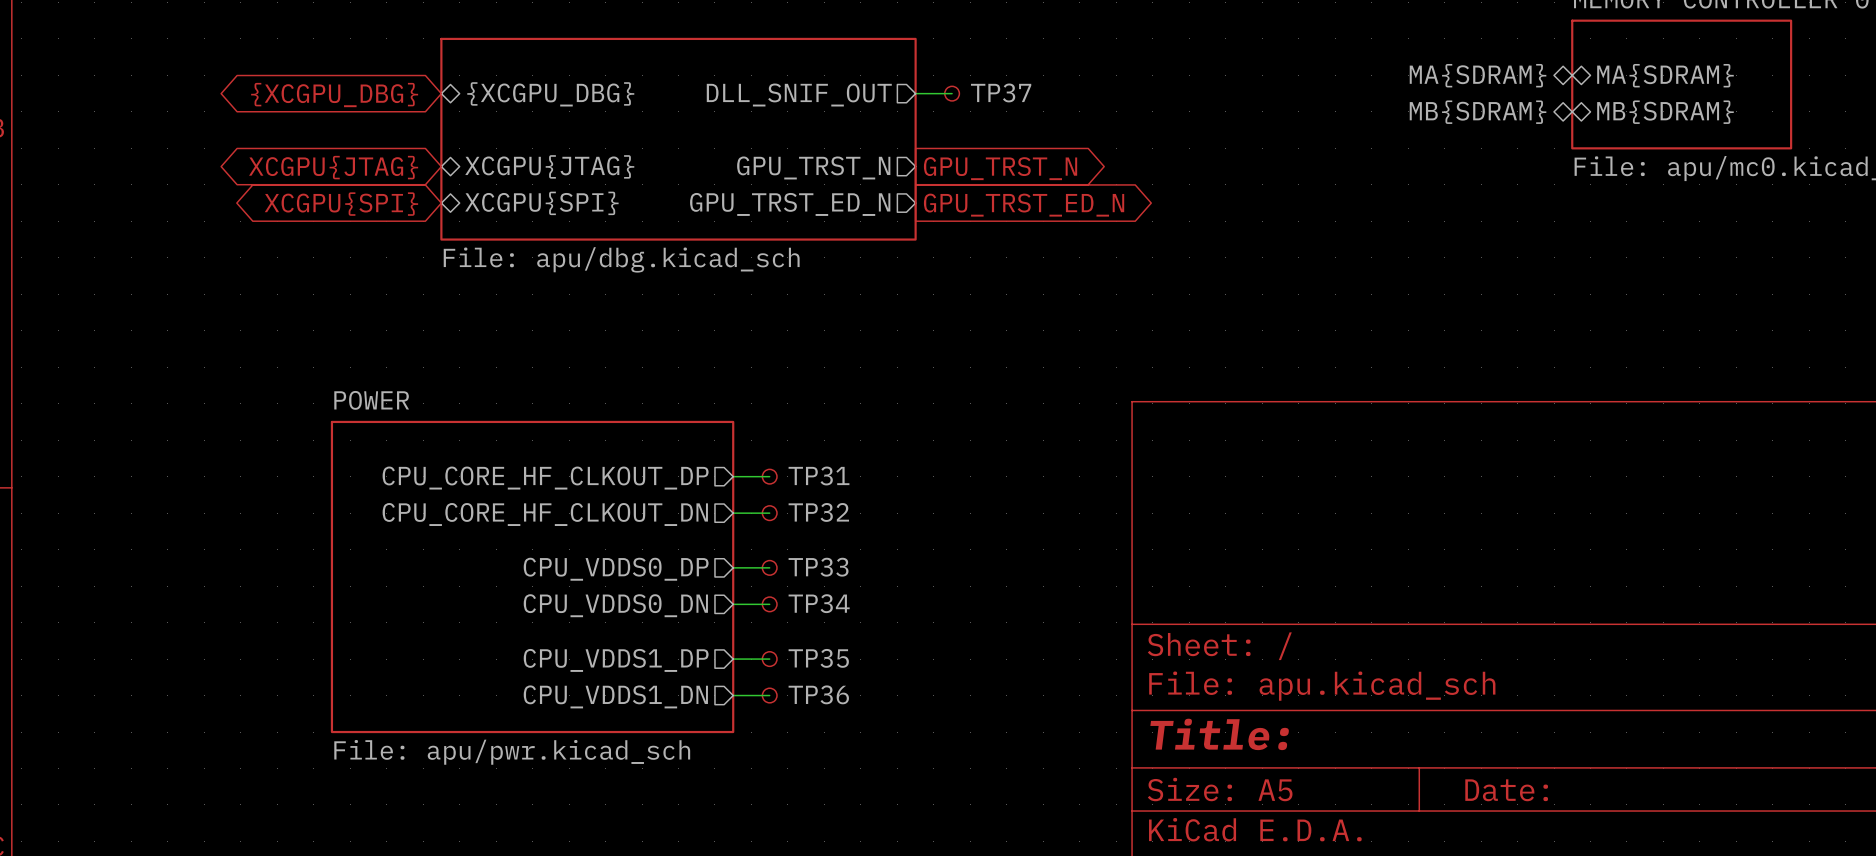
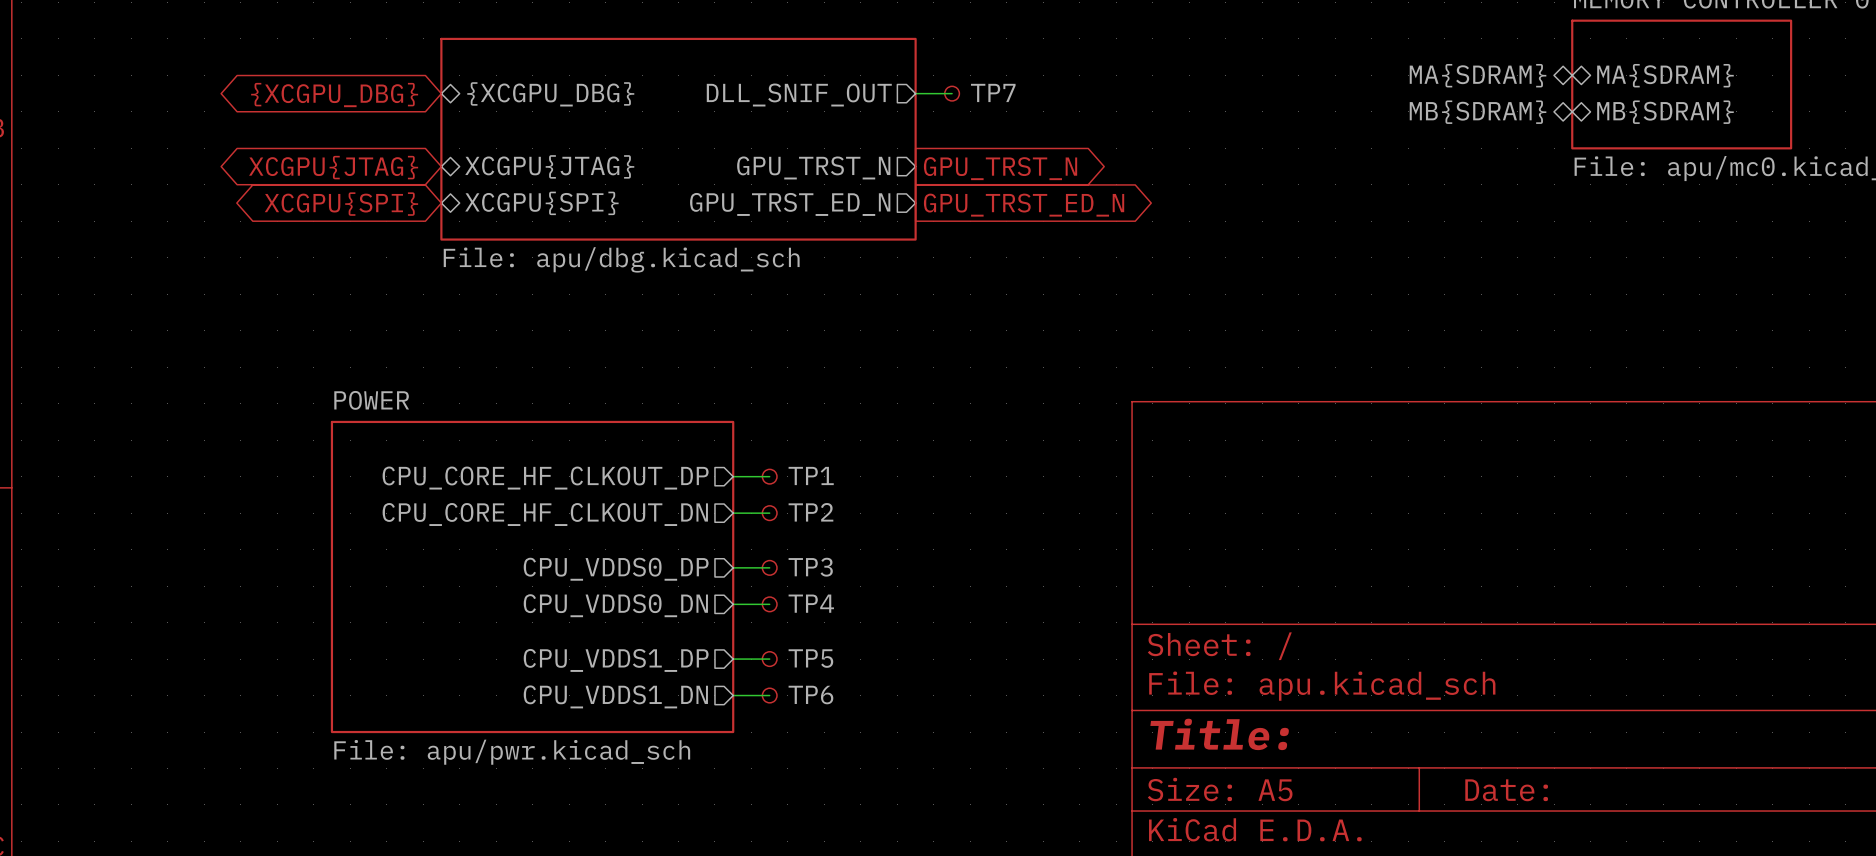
TP37 name: TP37 (1001, 92) -> TP7 (993, 92)
TP31 name: TP31 (819, 475) -> TP1 (811, 475)
TP32 name: TP32 (818, 512) -> TP2 (810, 512)
TP33 name: TP33 (818, 567) -> TP3 (810, 567)
TP34 name: TP34 (819, 603) -> TP4 (811, 603)
TP35 name: TP35 (818, 658) -> TP5 (810, 658)
TP36 name: TP36 (818, 694) -> TP6 (810, 695)

